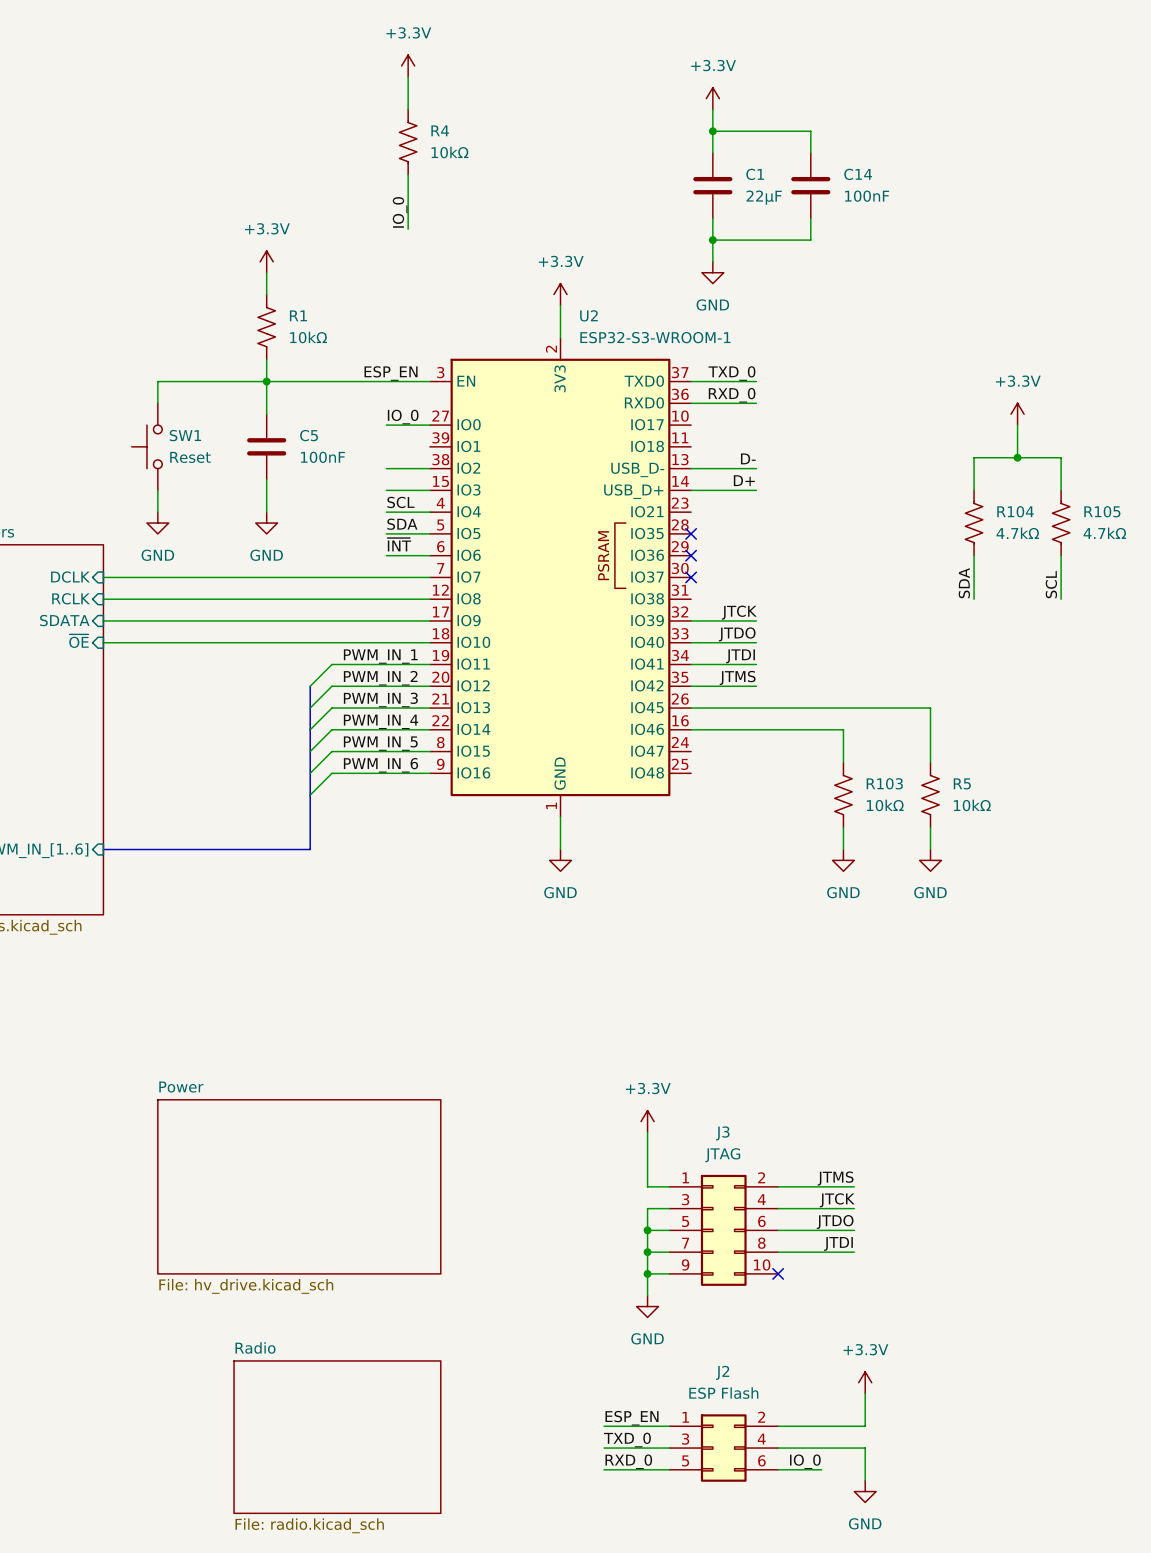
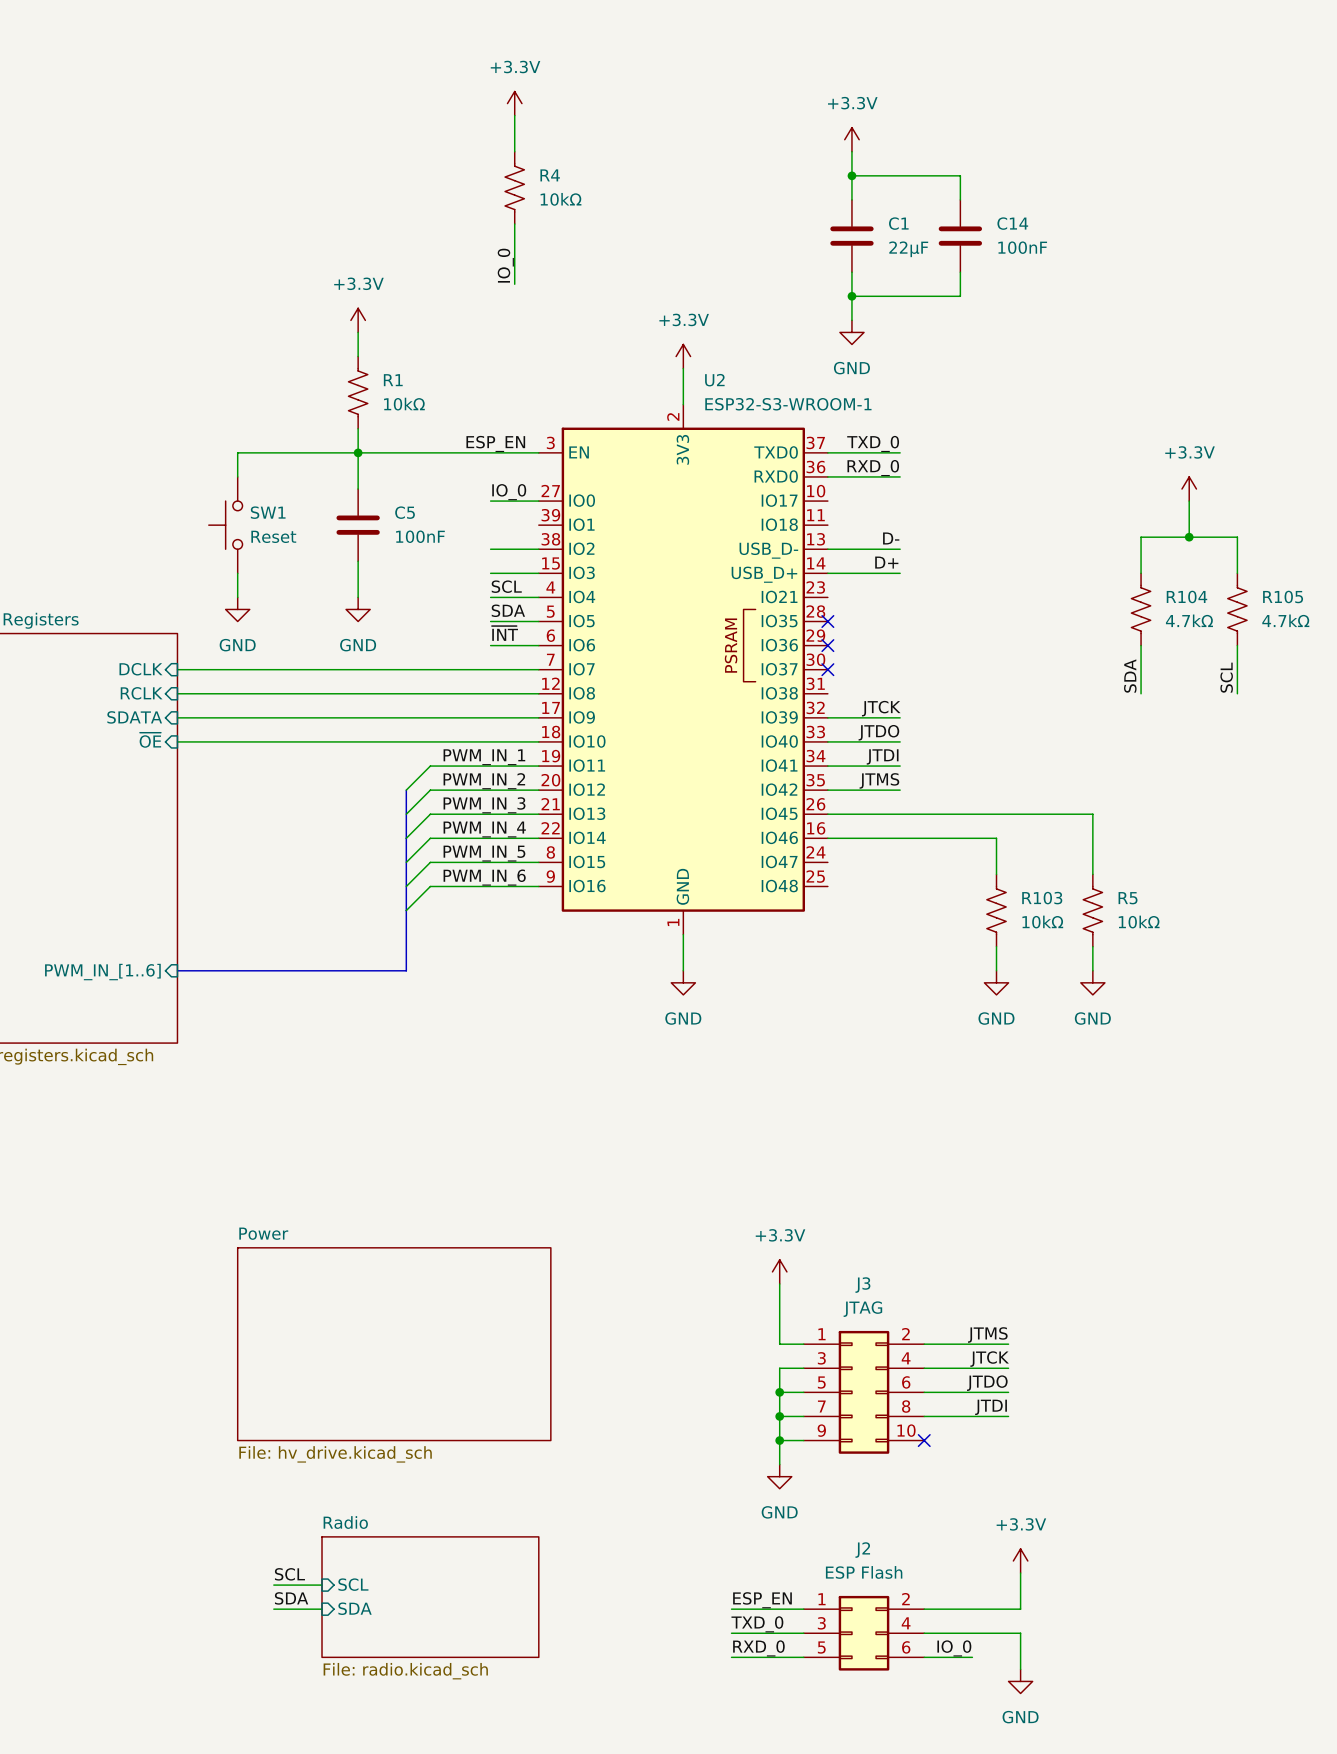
label: none -> SCL (289, 1574)
wire: none -> (273, 1585) (322, 1585)
sheet pin: none -> SCL (353, 1584)
sheet Radio: none -> File: radio.kicad_sch (430, 1597)
label: none -> SDA (291, 1598)
sheet pin: none -> SDA (355, 1608)
wire: none -> (273, 1609) (322, 1609)
sheet Radio: File: radio.kicad_sch (337, 1437) -> none

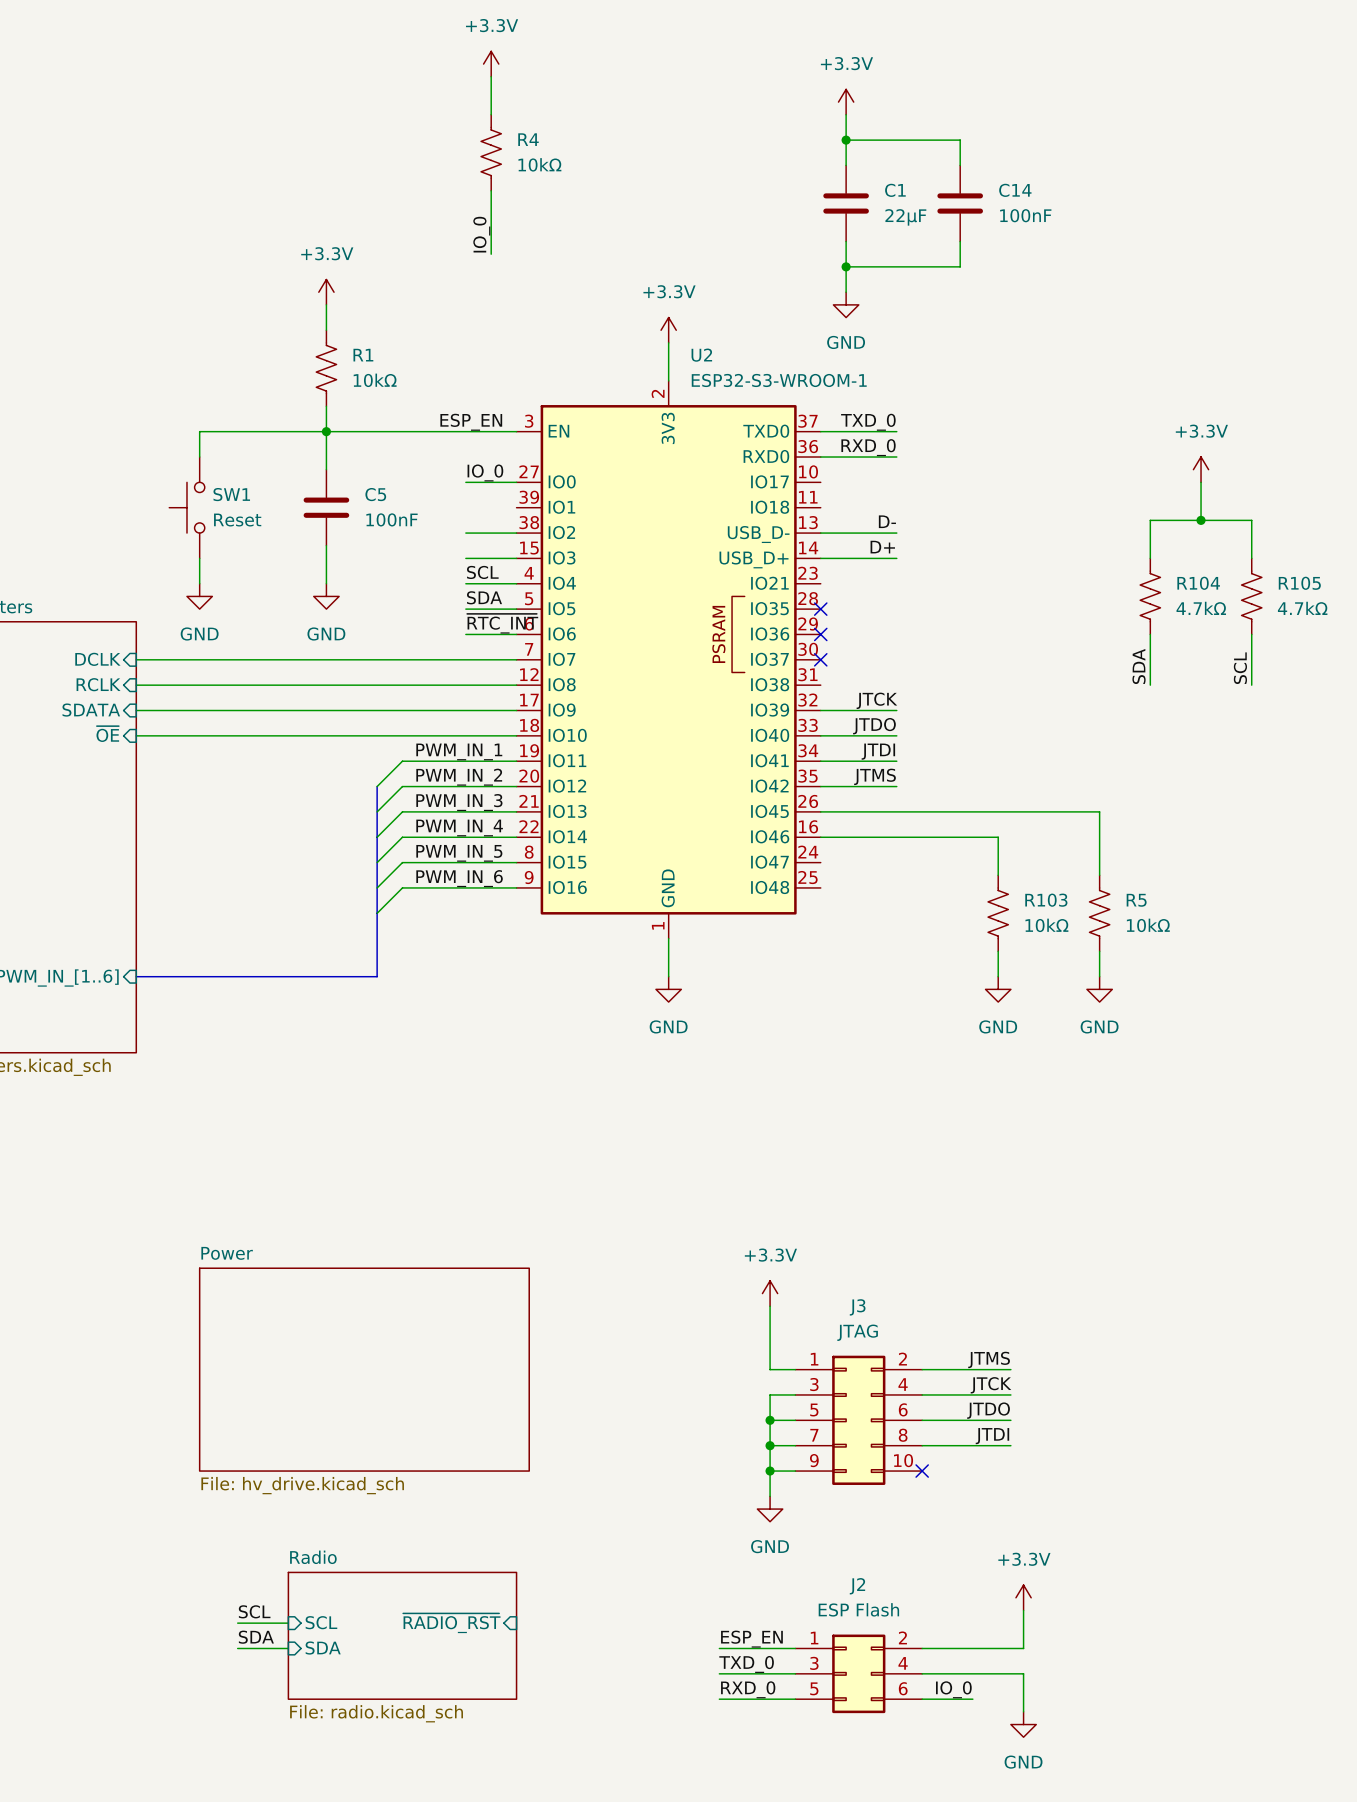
label: ~{INT} (504, 633) -> ~{RTC_INT} (502, 623)
sheet pin: none -> ~{RADIO_RST} (451, 1623)

